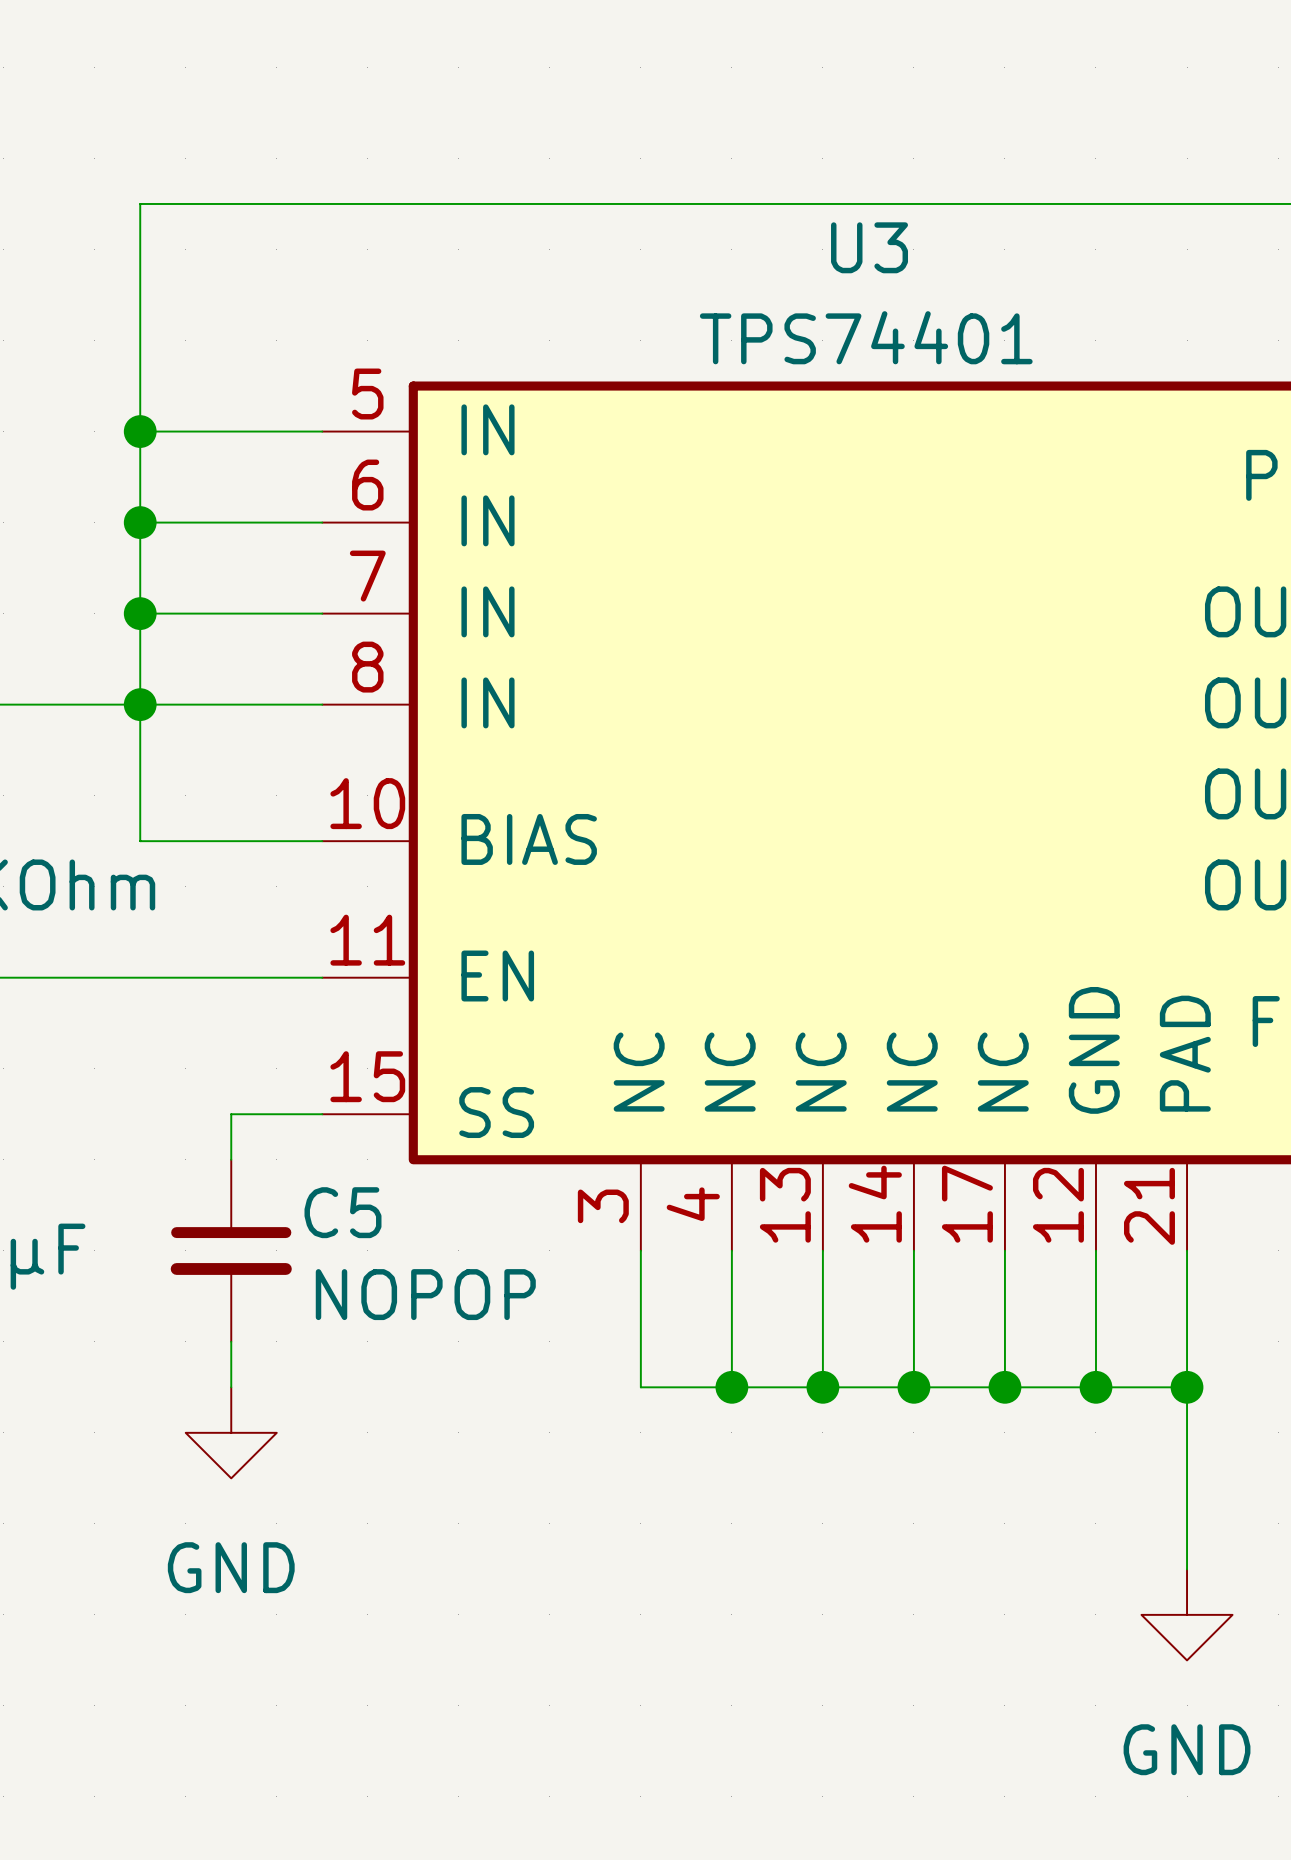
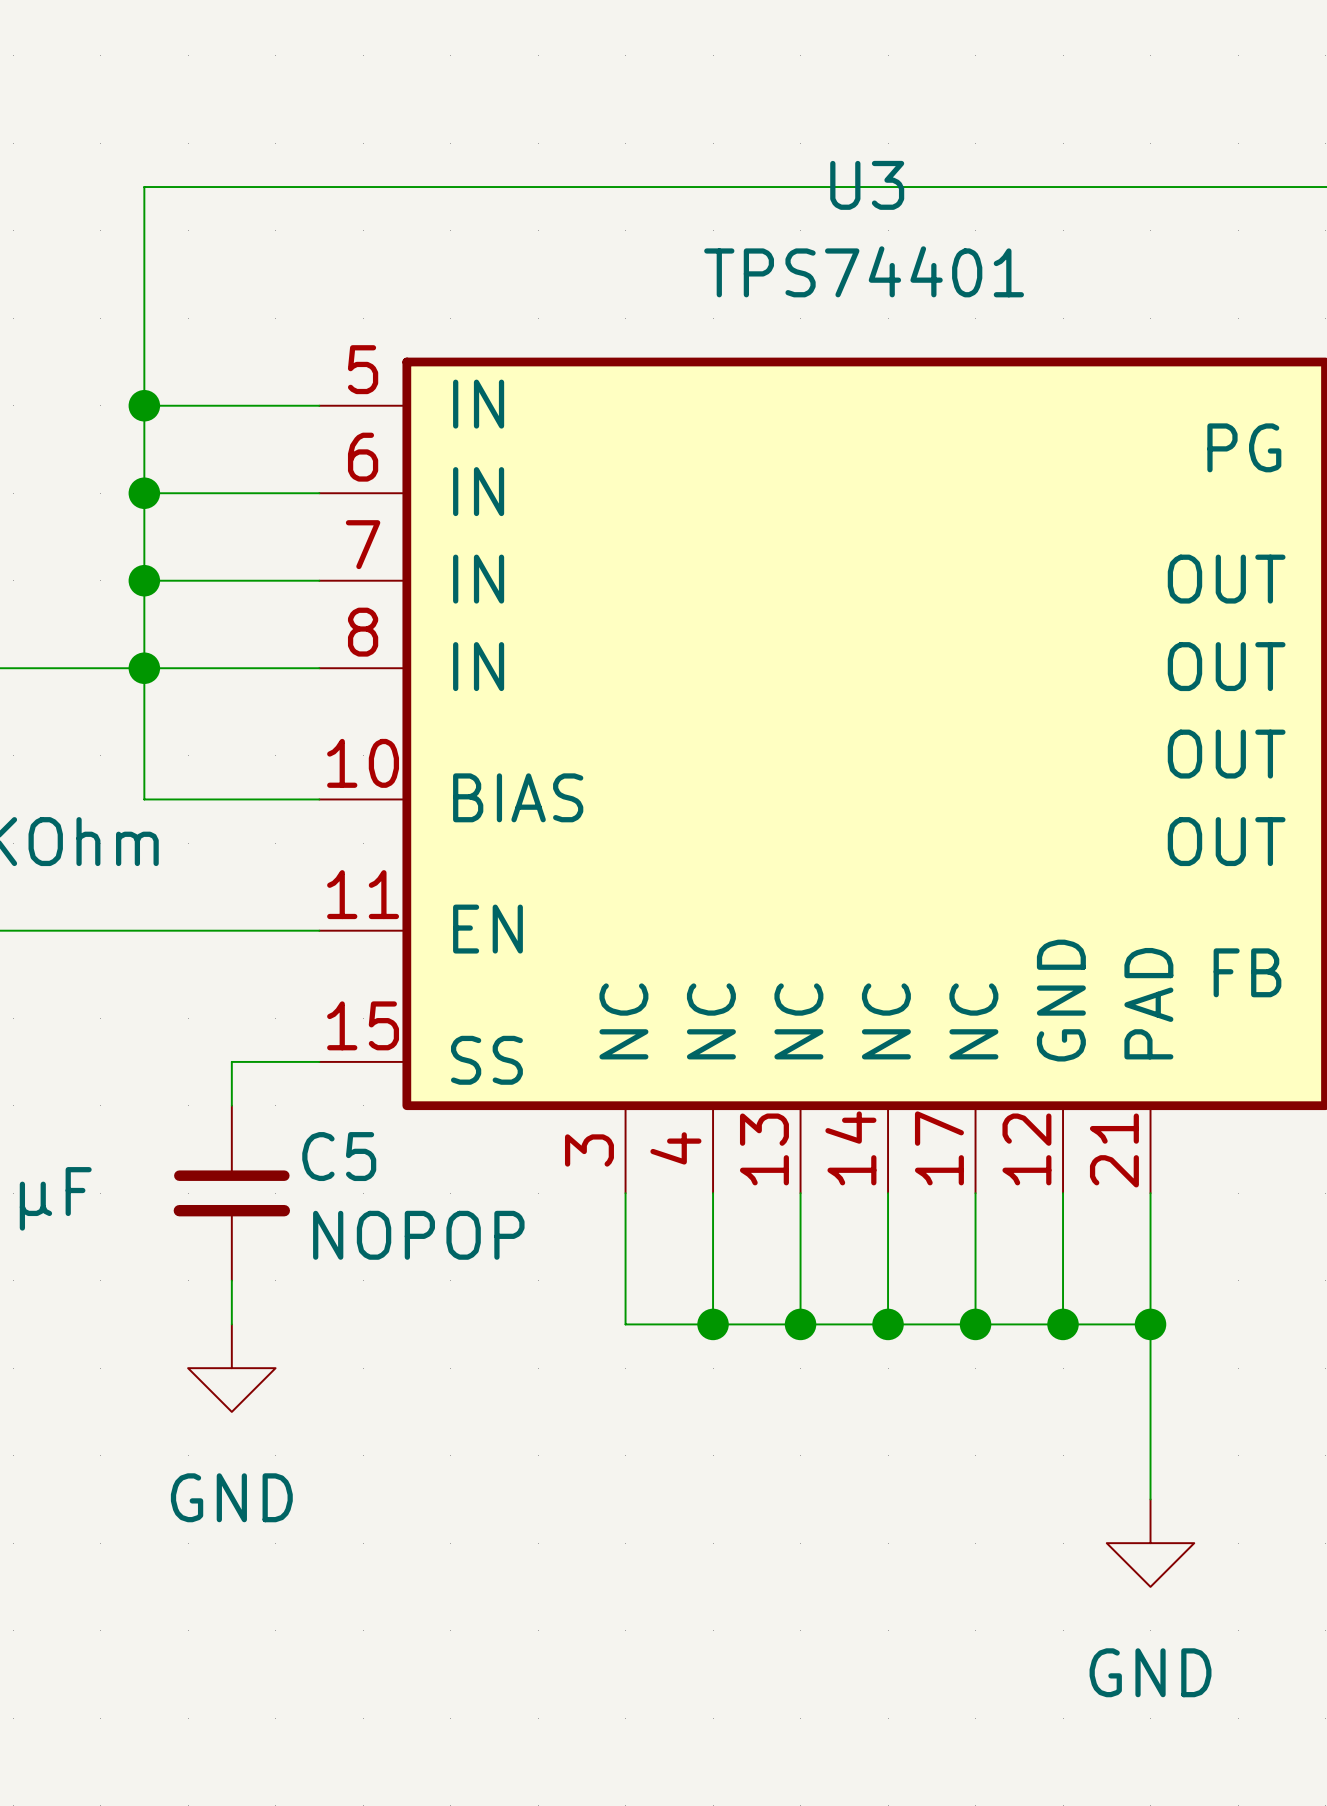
U3 name position: U3 (869, 247) -> U3 (867, 185)
U3 value position: TPS74401 (866, 337) -> TPS74401 (864, 271)

